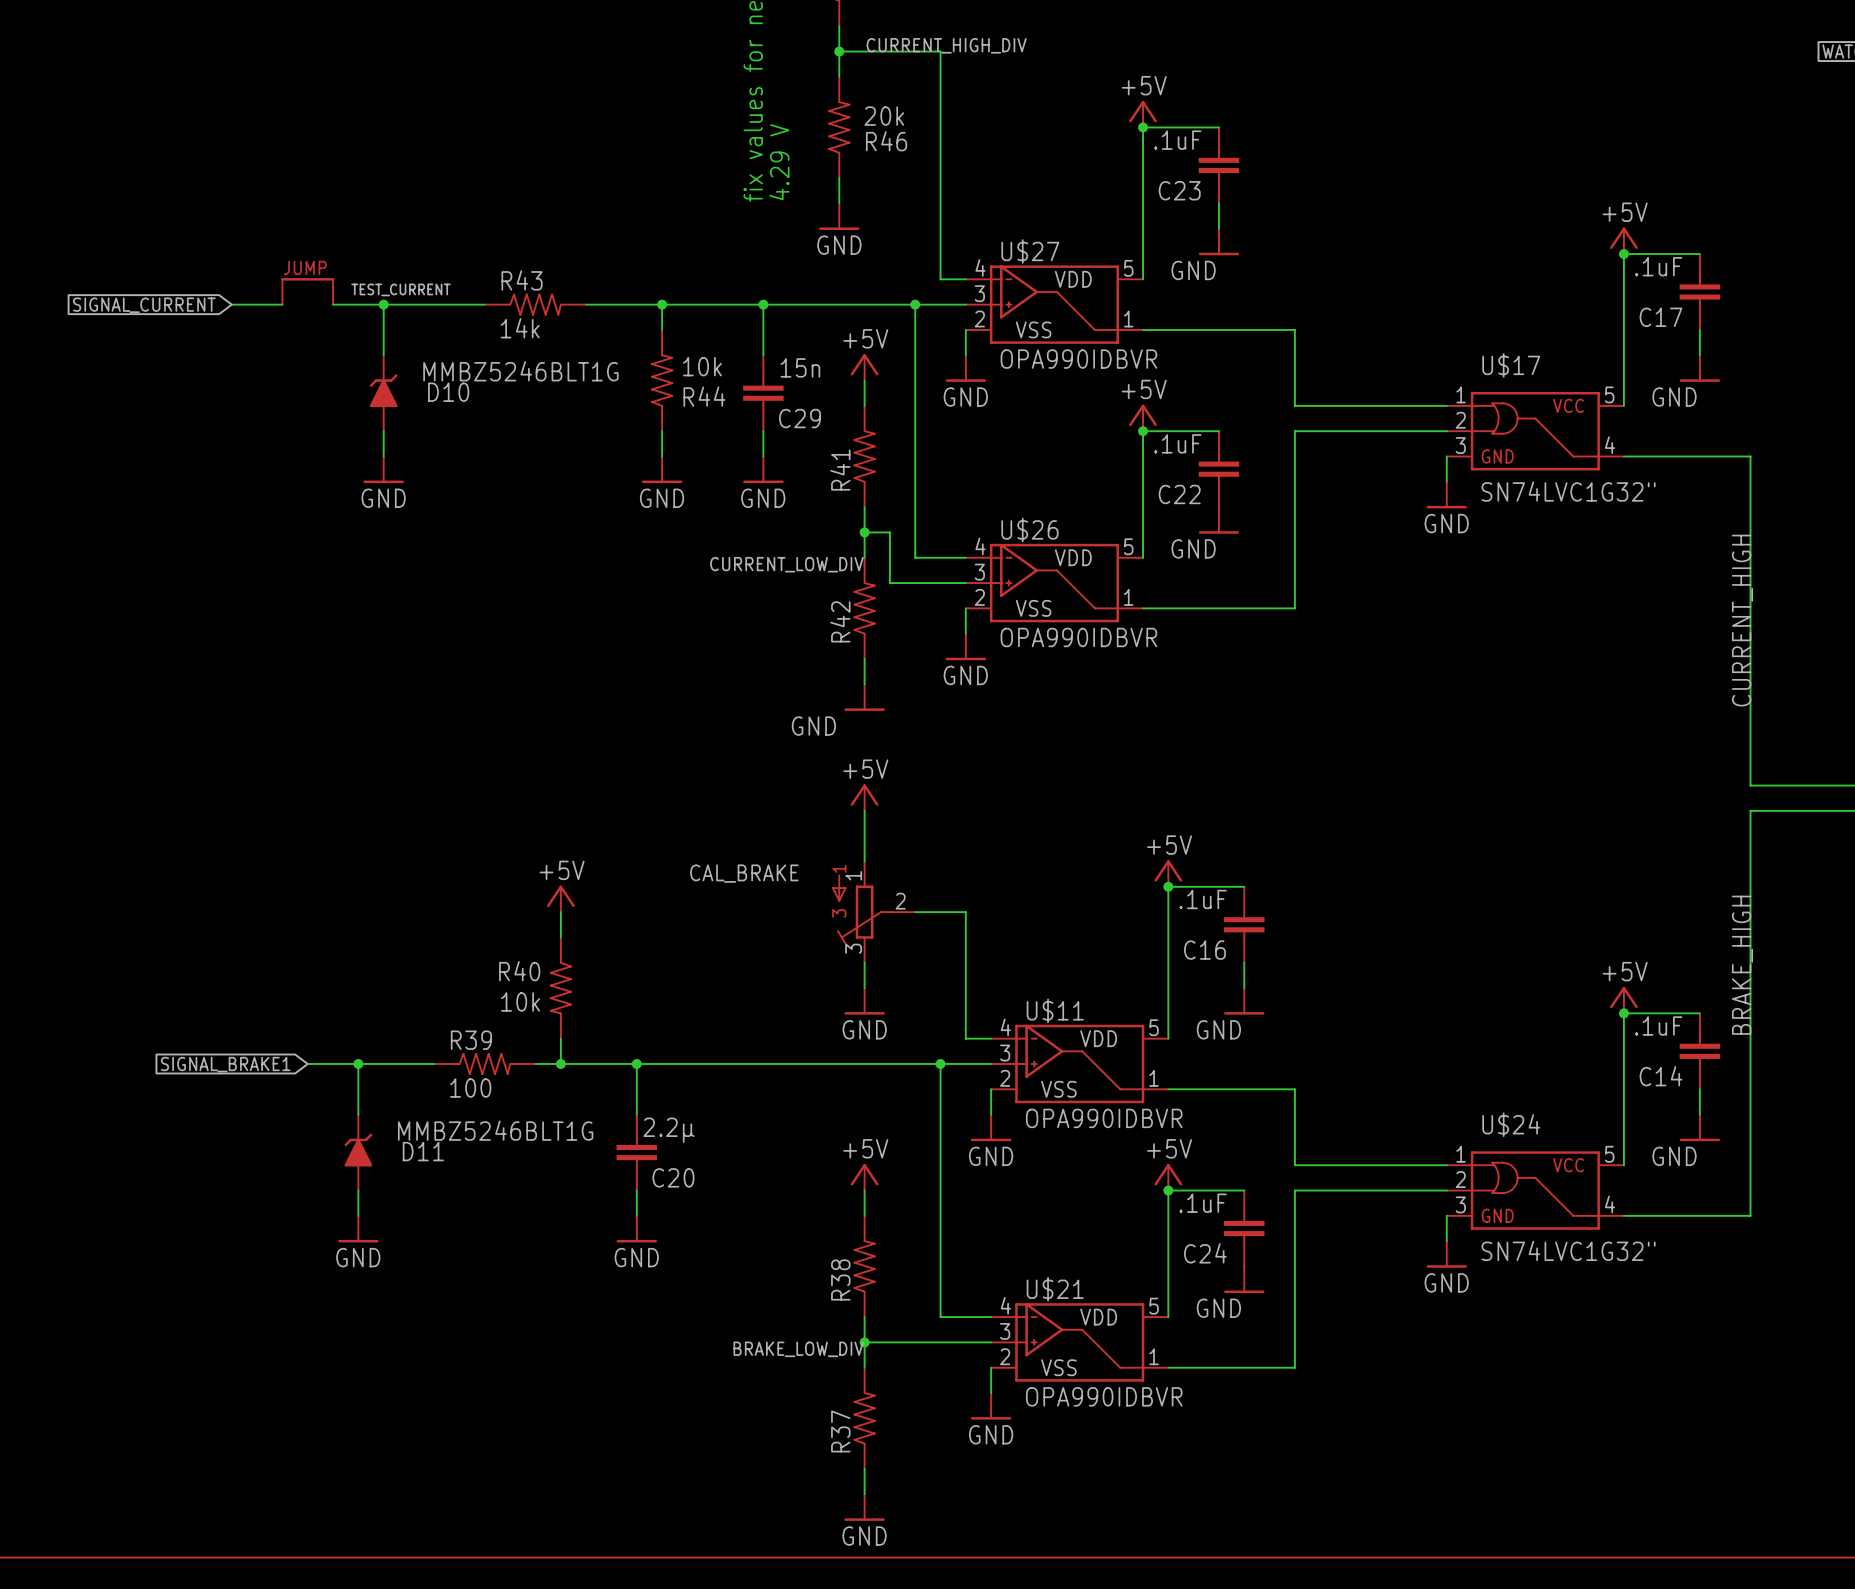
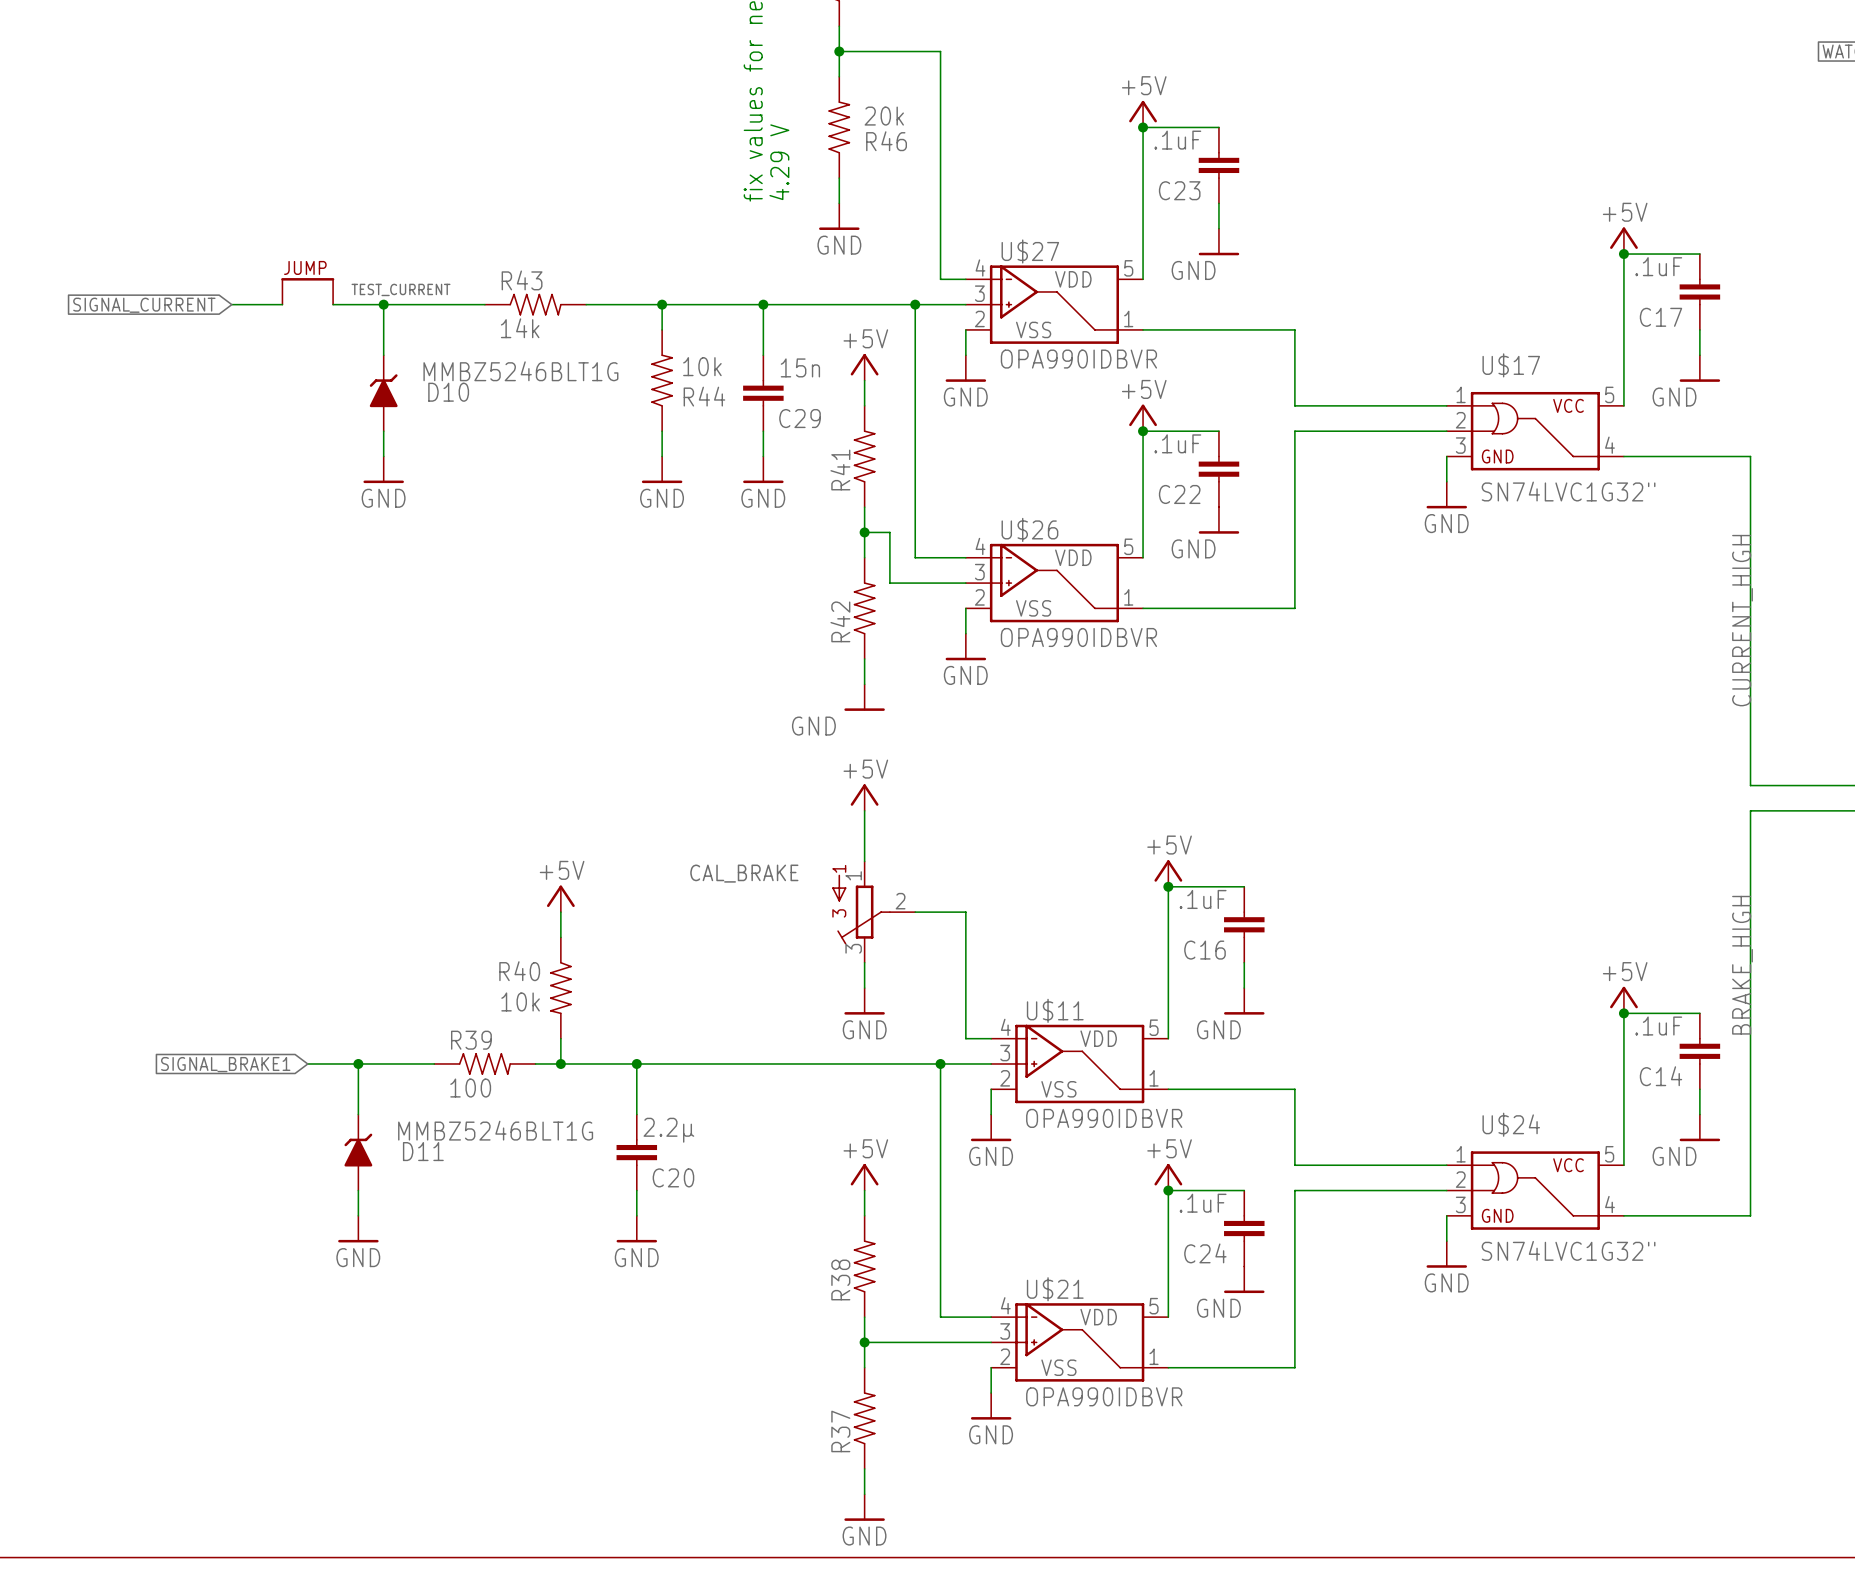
label: CURRENT_HIGH_DIV (946, 45) -> none
label: CURRENT_LOW_DIV (786, 564) -> none
label: BRAKE_LOW_DIV (798, 1349) -> none

